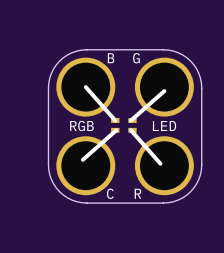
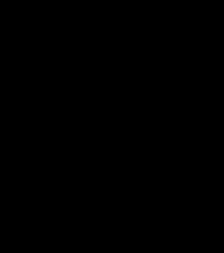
text: B (111, 58) -> none
text: G (136, 58) -> none
text: RGB (81, 126) -> none
part: (125, 126) -> none
text: LED (164, 126) -> none
text: C (110, 193) -> none
text: R (137, 193) -> none

